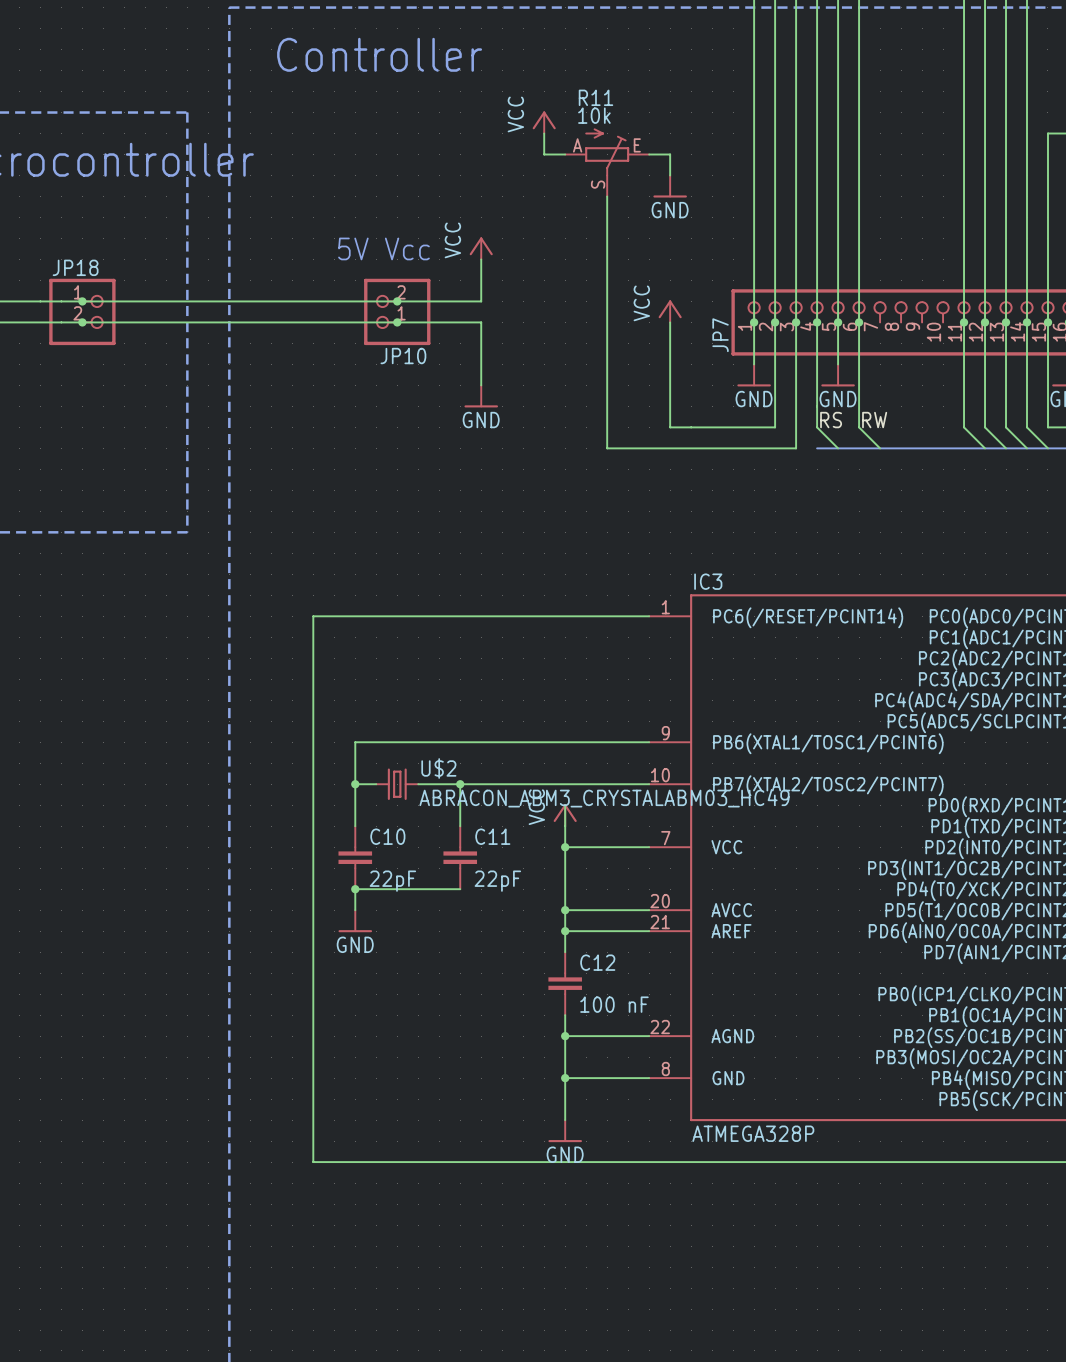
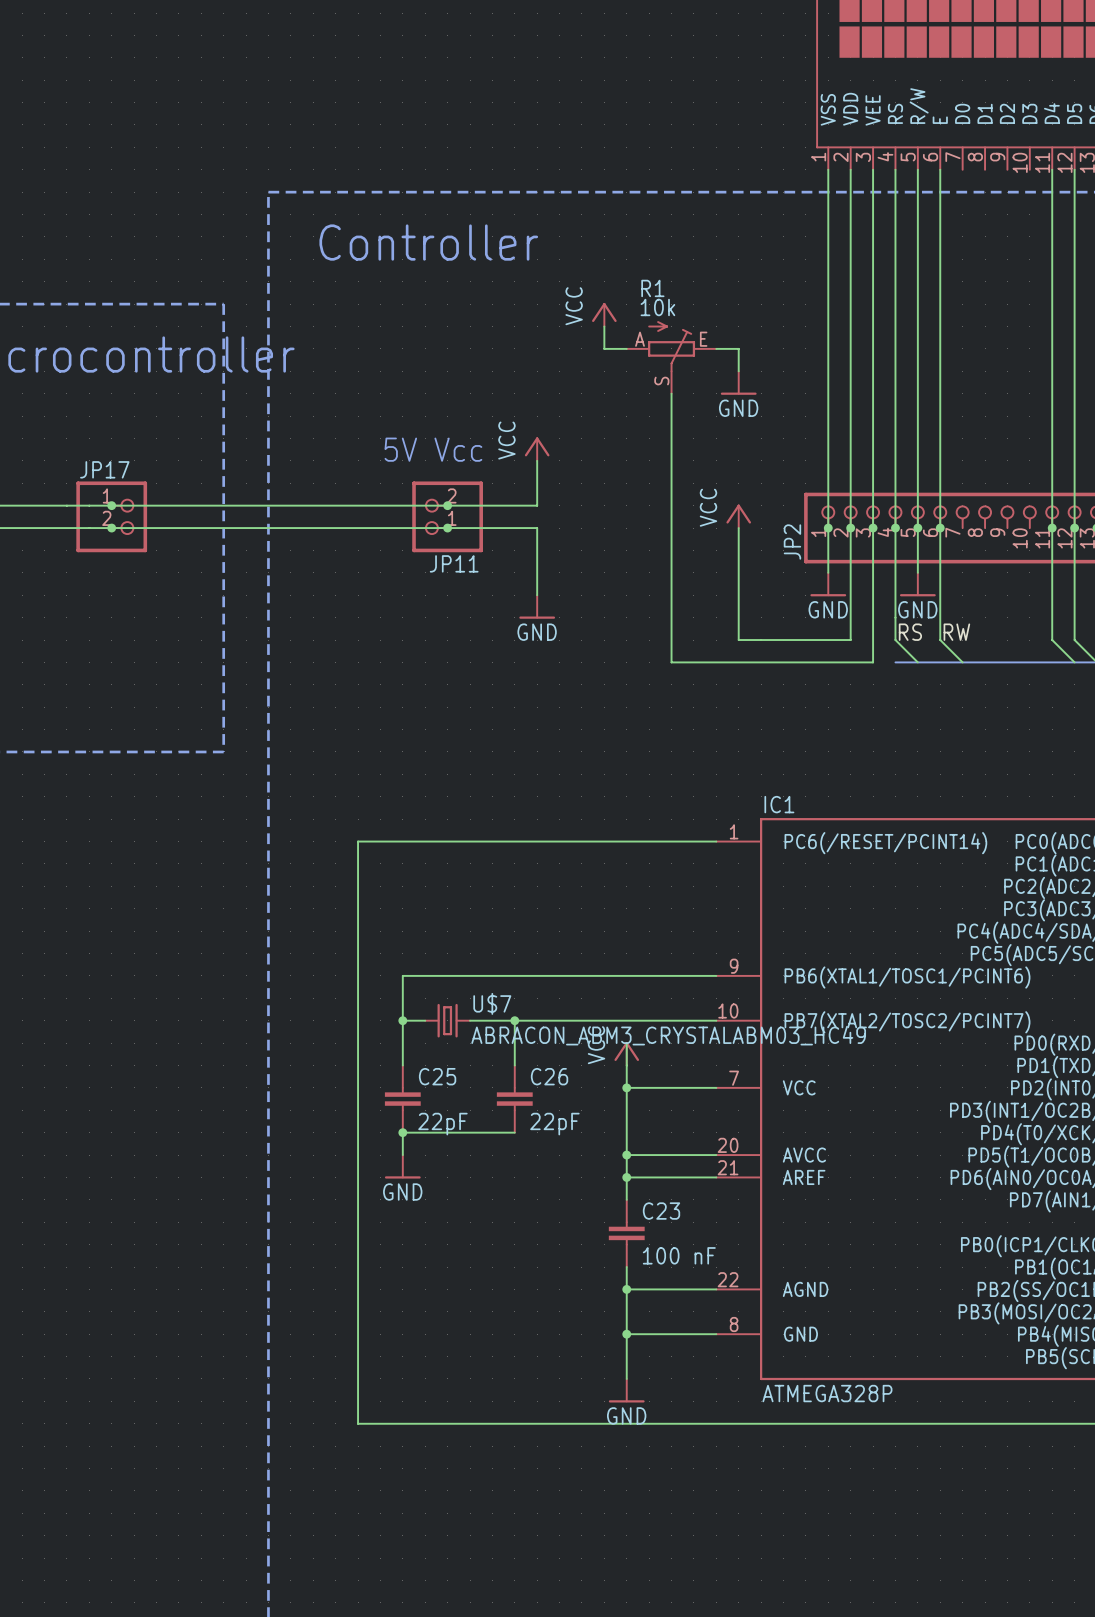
R11 name: R11 (595, 97) -> R1 (652, 288)
JP18 name: JP18 (75, 267) -> JP17 (104, 469)
JP7 name: JP7 (720, 335) -> JP2 (792, 542)
JP10 name: JP10 (403, 356) -> JP11 (454, 563)
IC3 name: IC3 (708, 581) -> IC1 (779, 804)
U$2 name: U$2 (438, 768) -> U$7 (492, 1003)
C10 name: C10 (387, 836) -> C25 (437, 1076)
C11 name: C11 (492, 836) -> C26 (549, 1076)
C12 name: C12 (597, 962) -> C23 (661, 1211)

